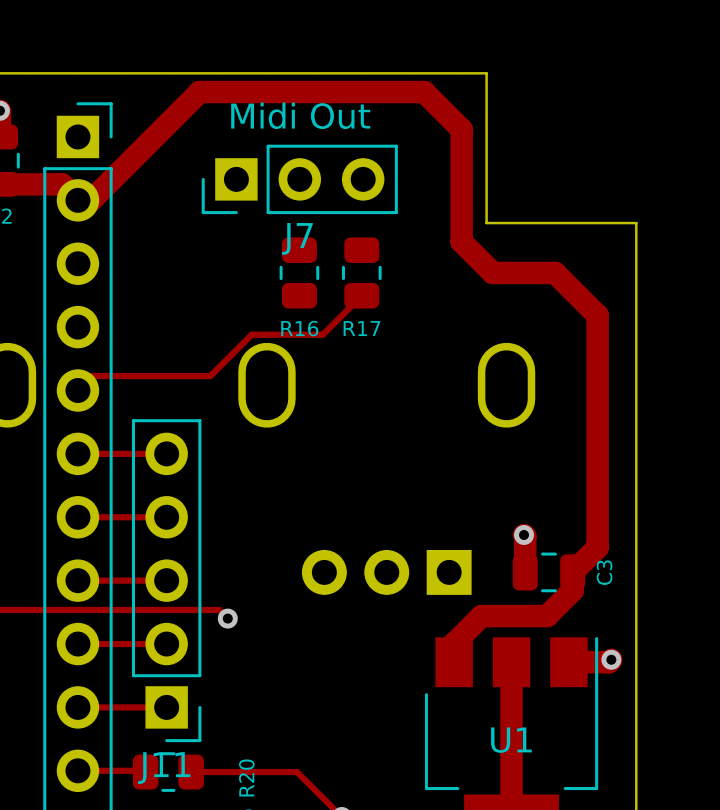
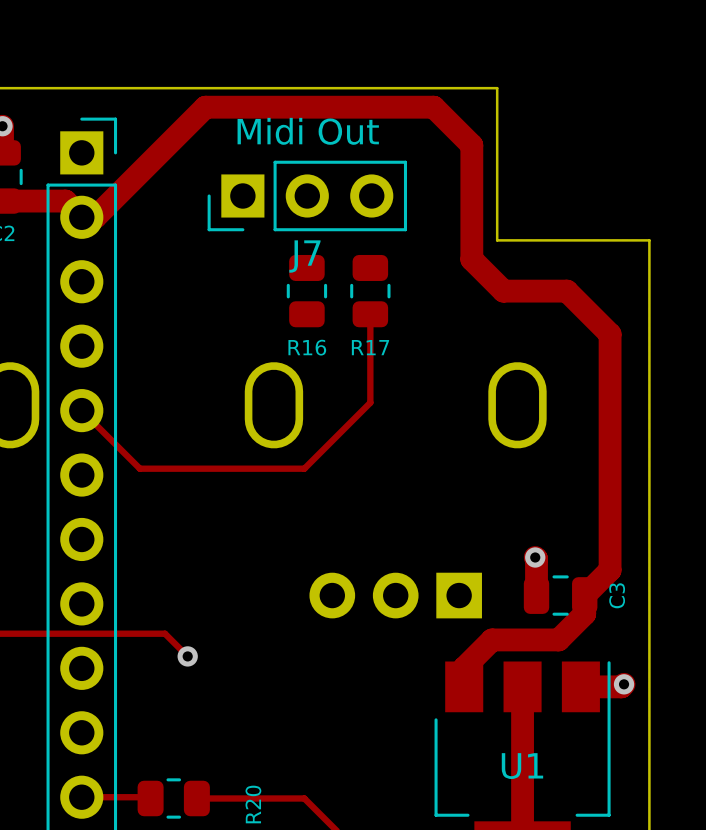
track: (361, 295) (322, 334) (251, 334) (210, 376) (92, 376) (77, 390) -> (370, 314) (370, 402) (304, 468) (139, 468) (81, 410)
track: (77, 453) (166, 453) -> none
track: (77, 517) (166, 517) -> none
track: (77, 580) (166, 580) -> none
J11: (166, 580) -> none
track: (159, 609) (219, 609) (227, 618) -> (164, 633) (187, 656)
via position: (227, 618) -> (187, 656)
track: (77, 644) (166, 644) -> none
track: (77, 707) (166, 707) -> none

